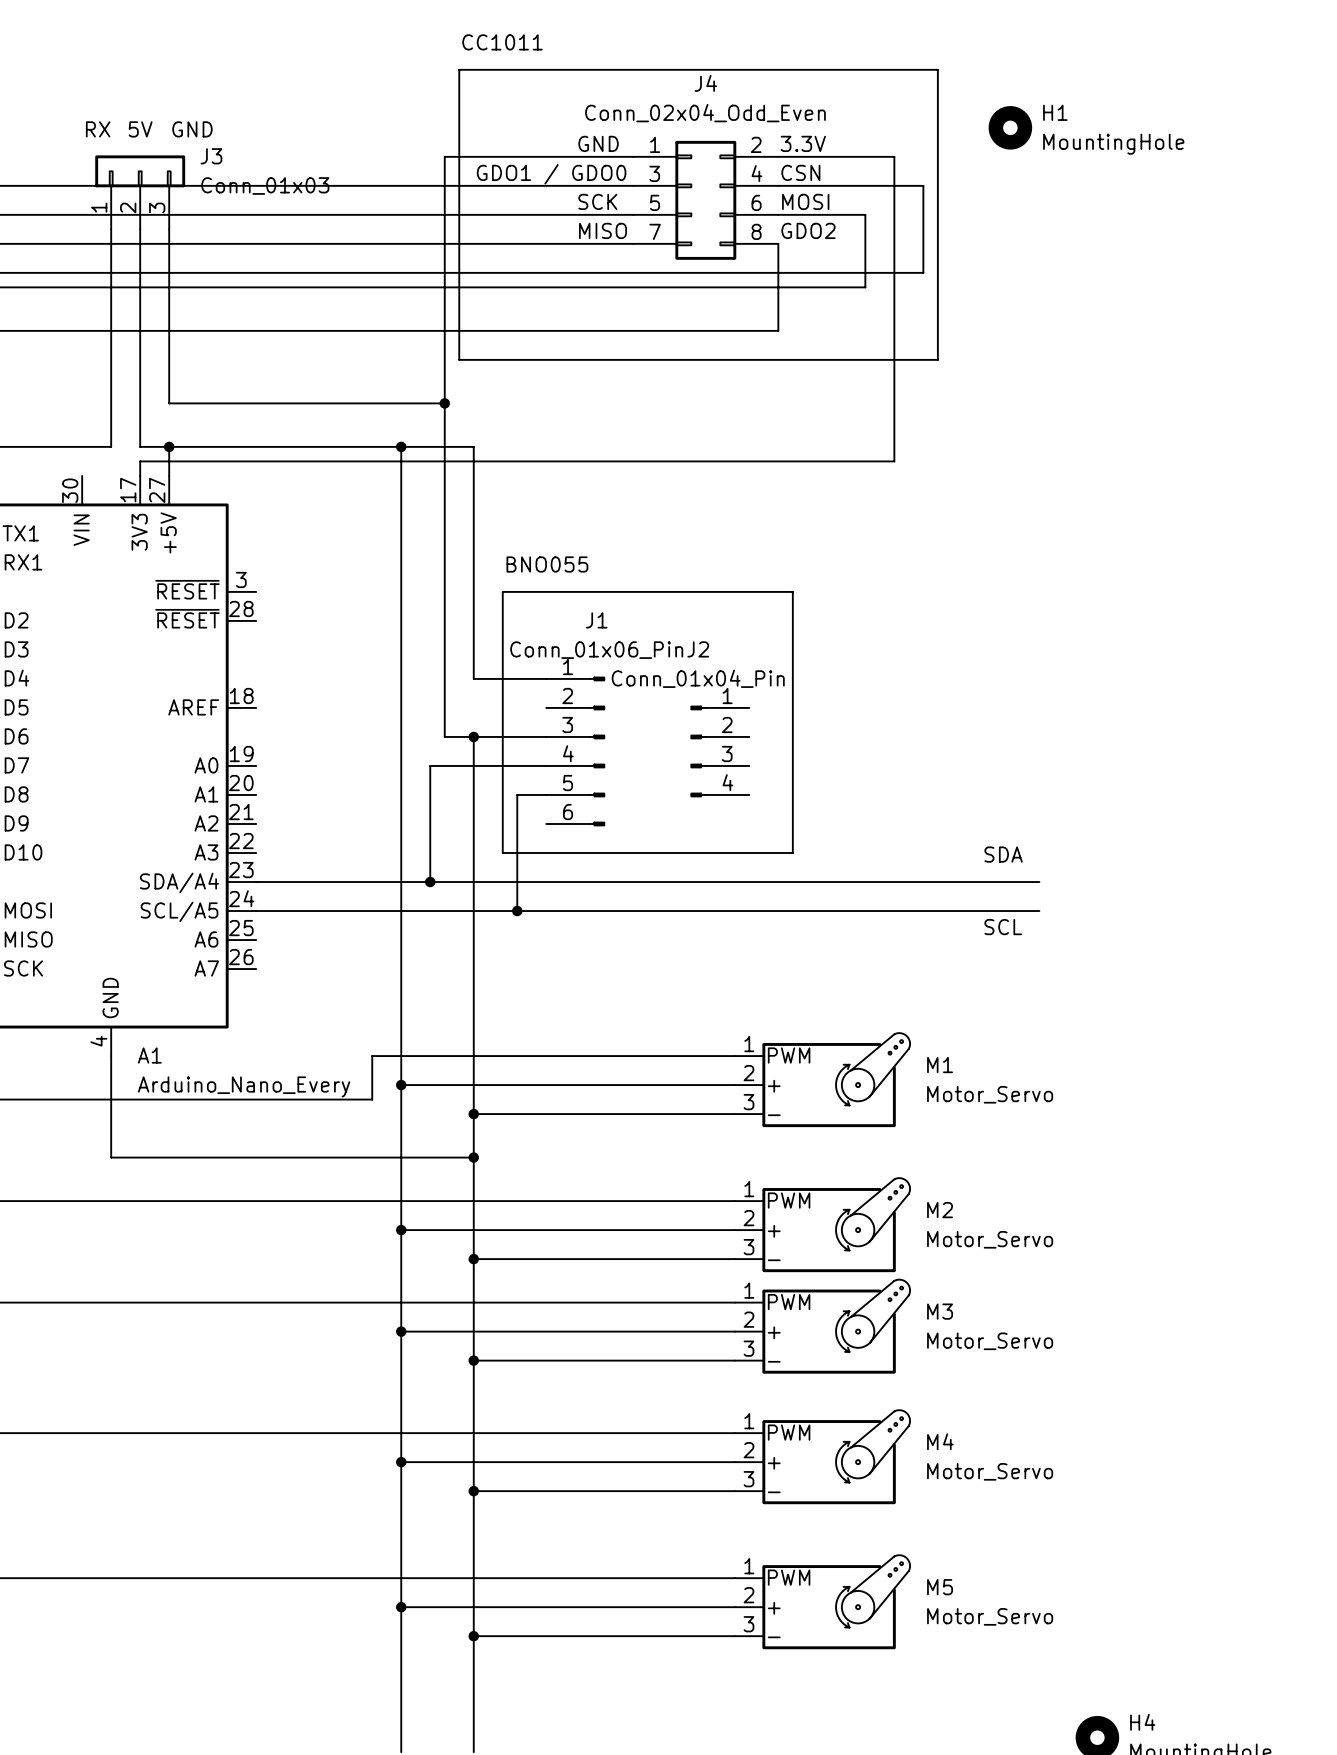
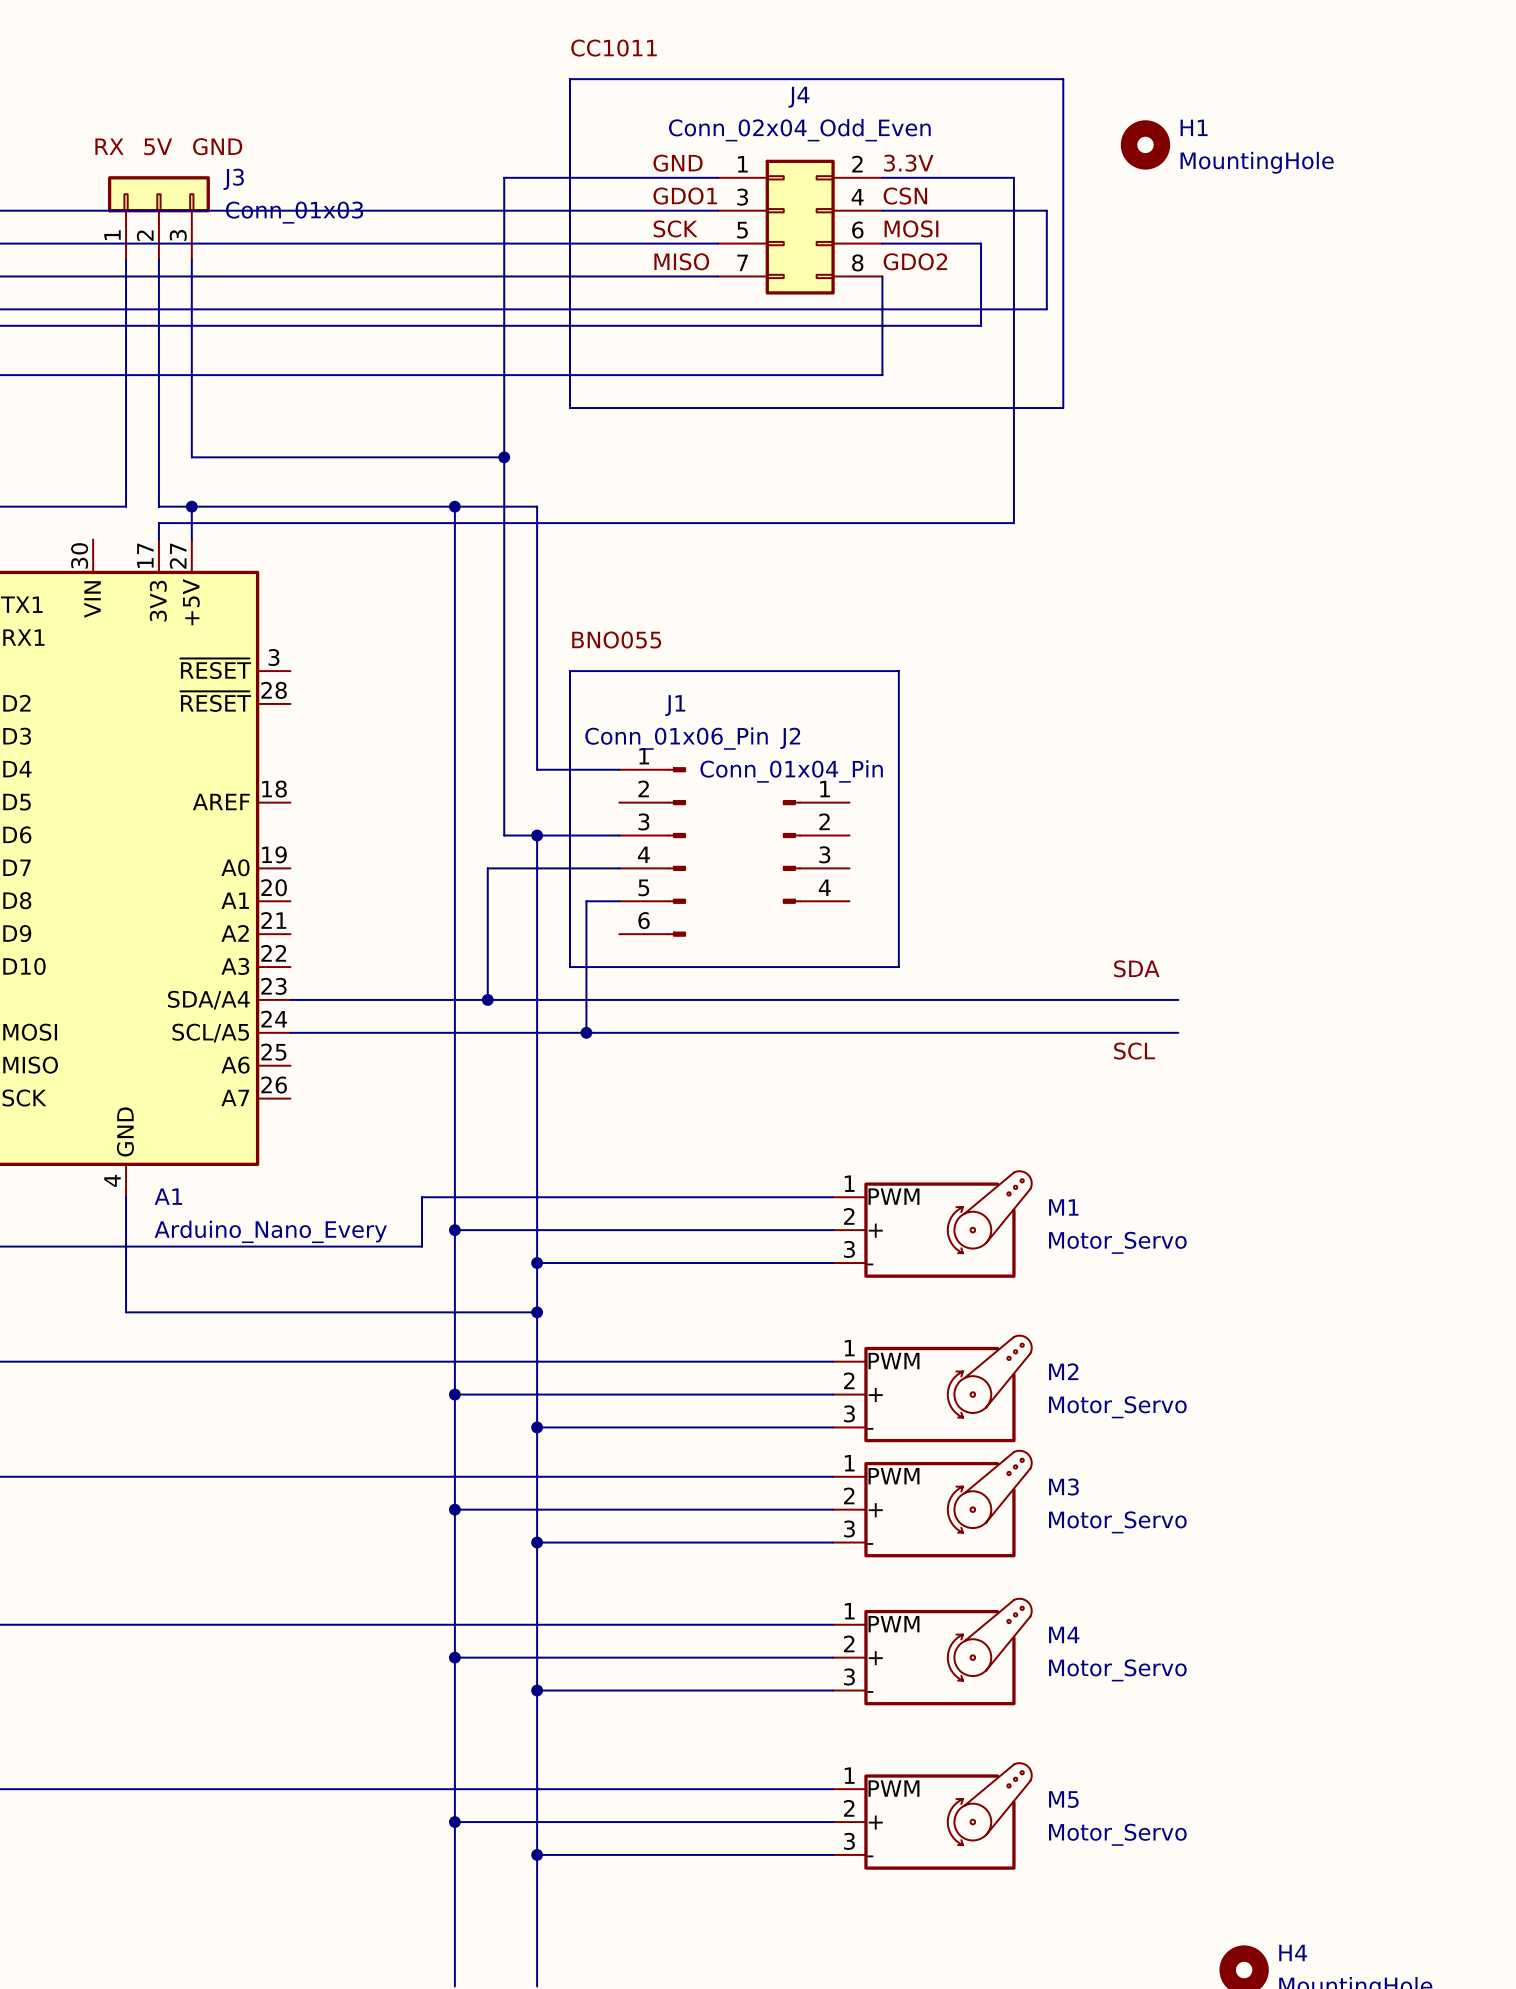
label position: CC1011 (502, 42) -> CC1011 (614, 48)
line: (502, 69) (459, 69) (459, 359) (502, 359) -> (569, 79) (569, 408)
label: none -> GDO1 (685, 196)
label: GDO1 / GDO0 (551, 174) -> none

